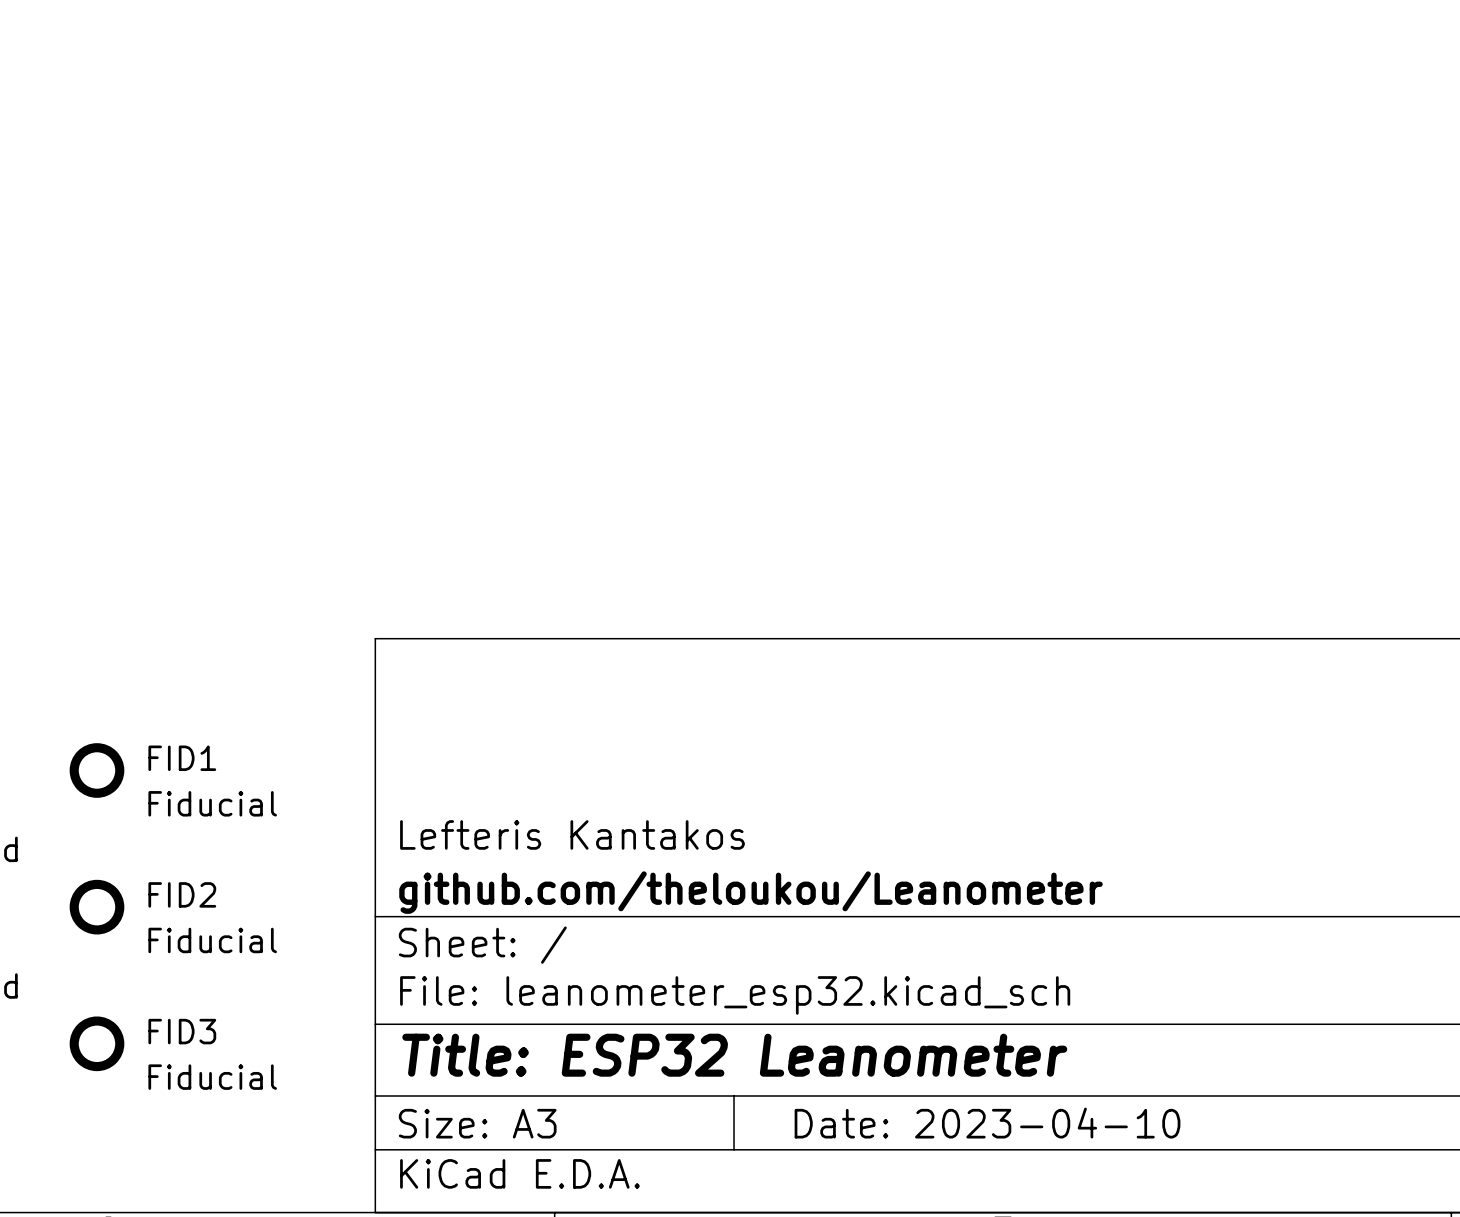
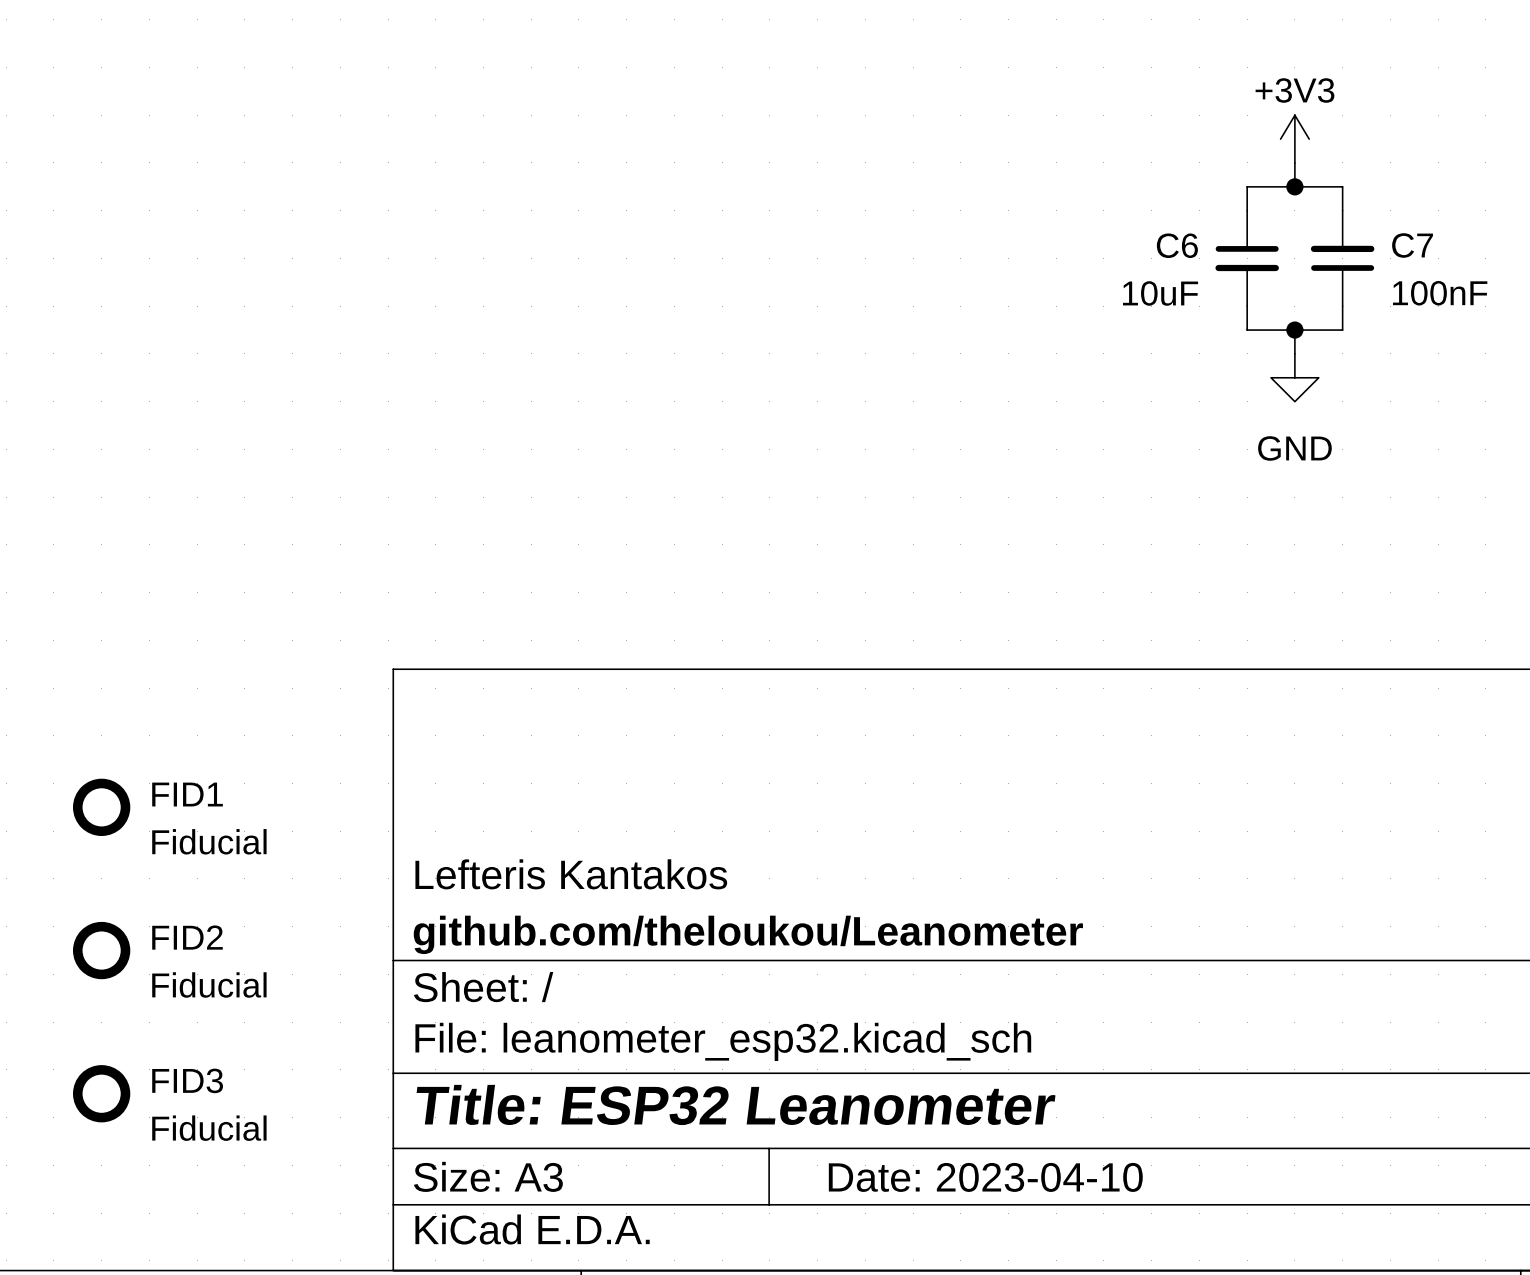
power symbol: none -> +3V3 (1294, 139)
wire: none -> (1294, 162) (1294, 186)
junction: none -> (1294, 186)
wire: none -> (1247, 210) (1247, 186) (1342, 186) (1342, 210)
C6: none -> 10uF (1247, 258)
C7: none -> 100nF (1342, 258)
wire: none -> (1247, 306) (1247, 330) (1342, 330) (1342, 306)
wire: none -> (1294, 330) (1294, 353)
junction: none -> (1294, 330)
power symbol: none -> GND (1294, 377)

